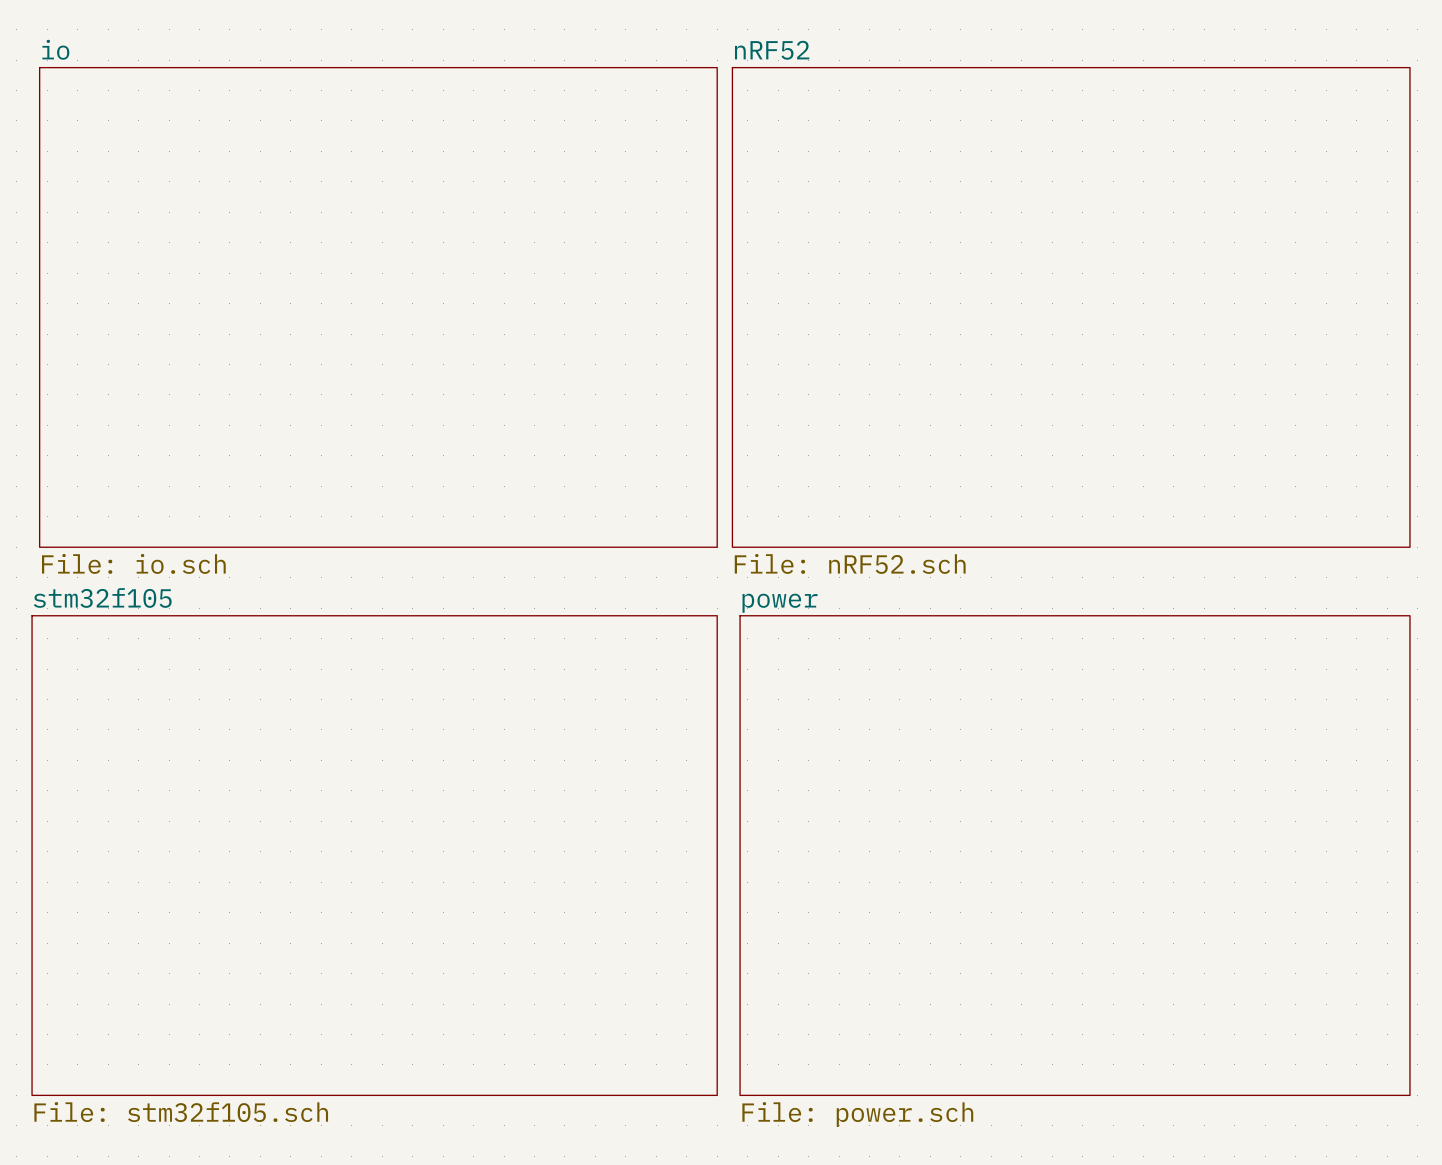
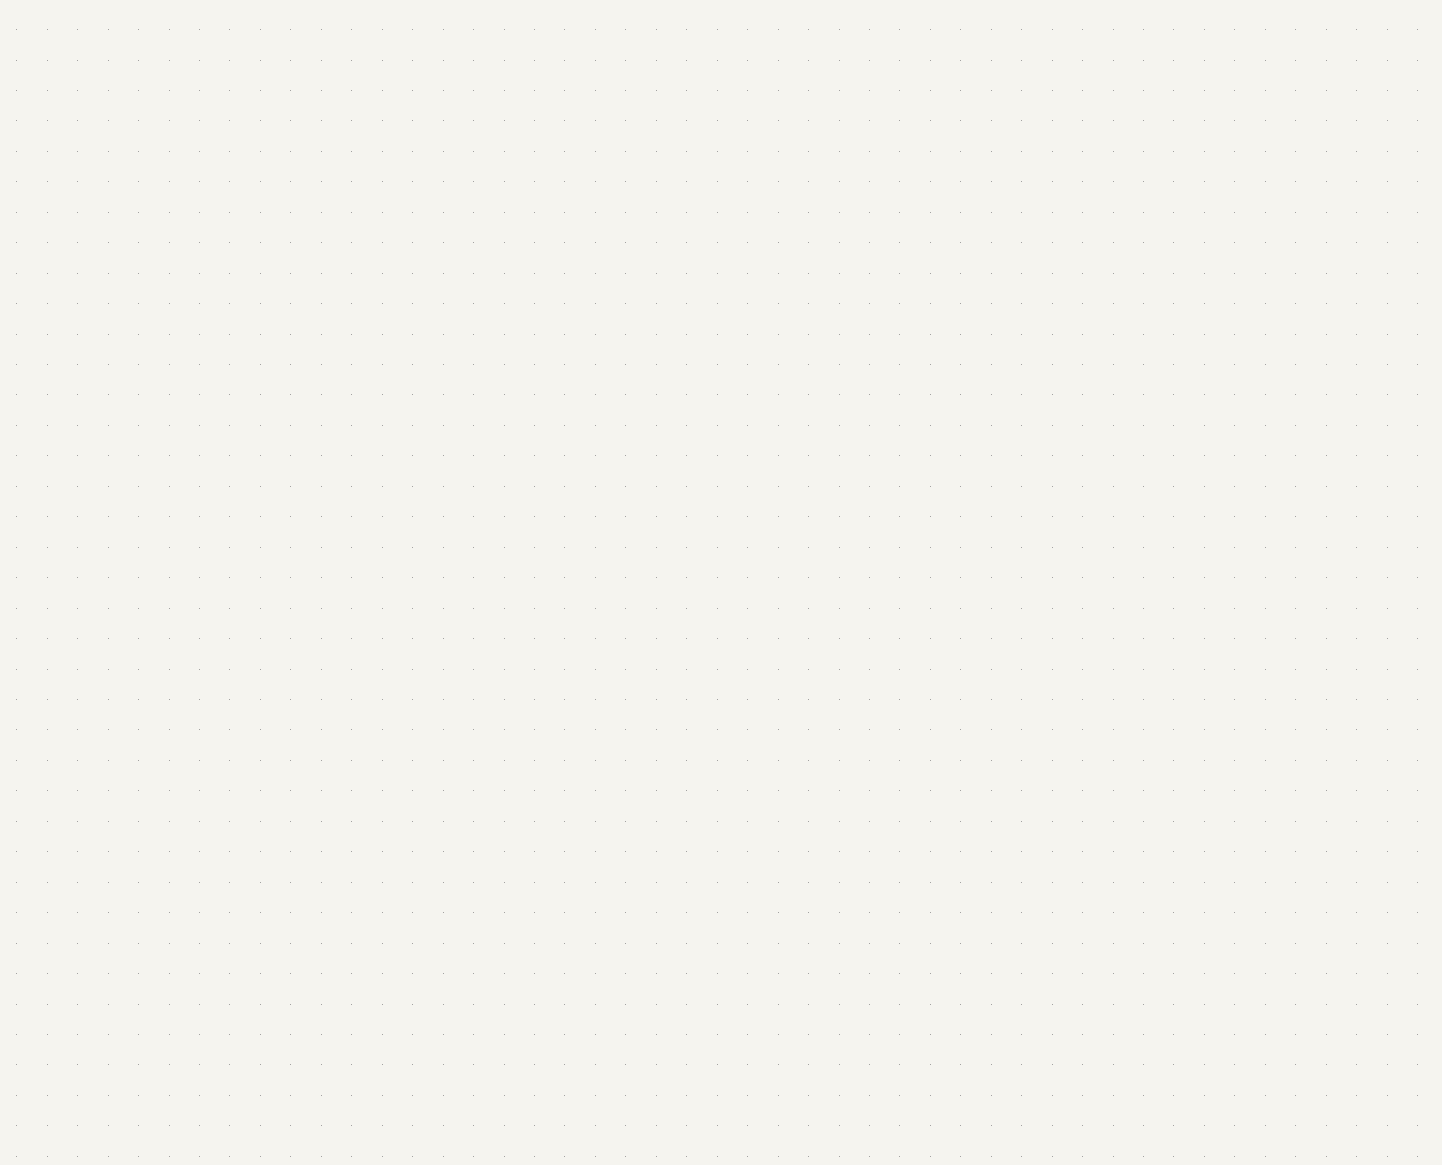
sheet io: File: io.sch (378, 307) -> none
sheet nRF52: File: nRF52.sch (1071, 307) -> none
sheet stm32f105: File: stm32f105.sch (374, 855) -> none
sheet power: File: power.sch (1075, 855) -> none

